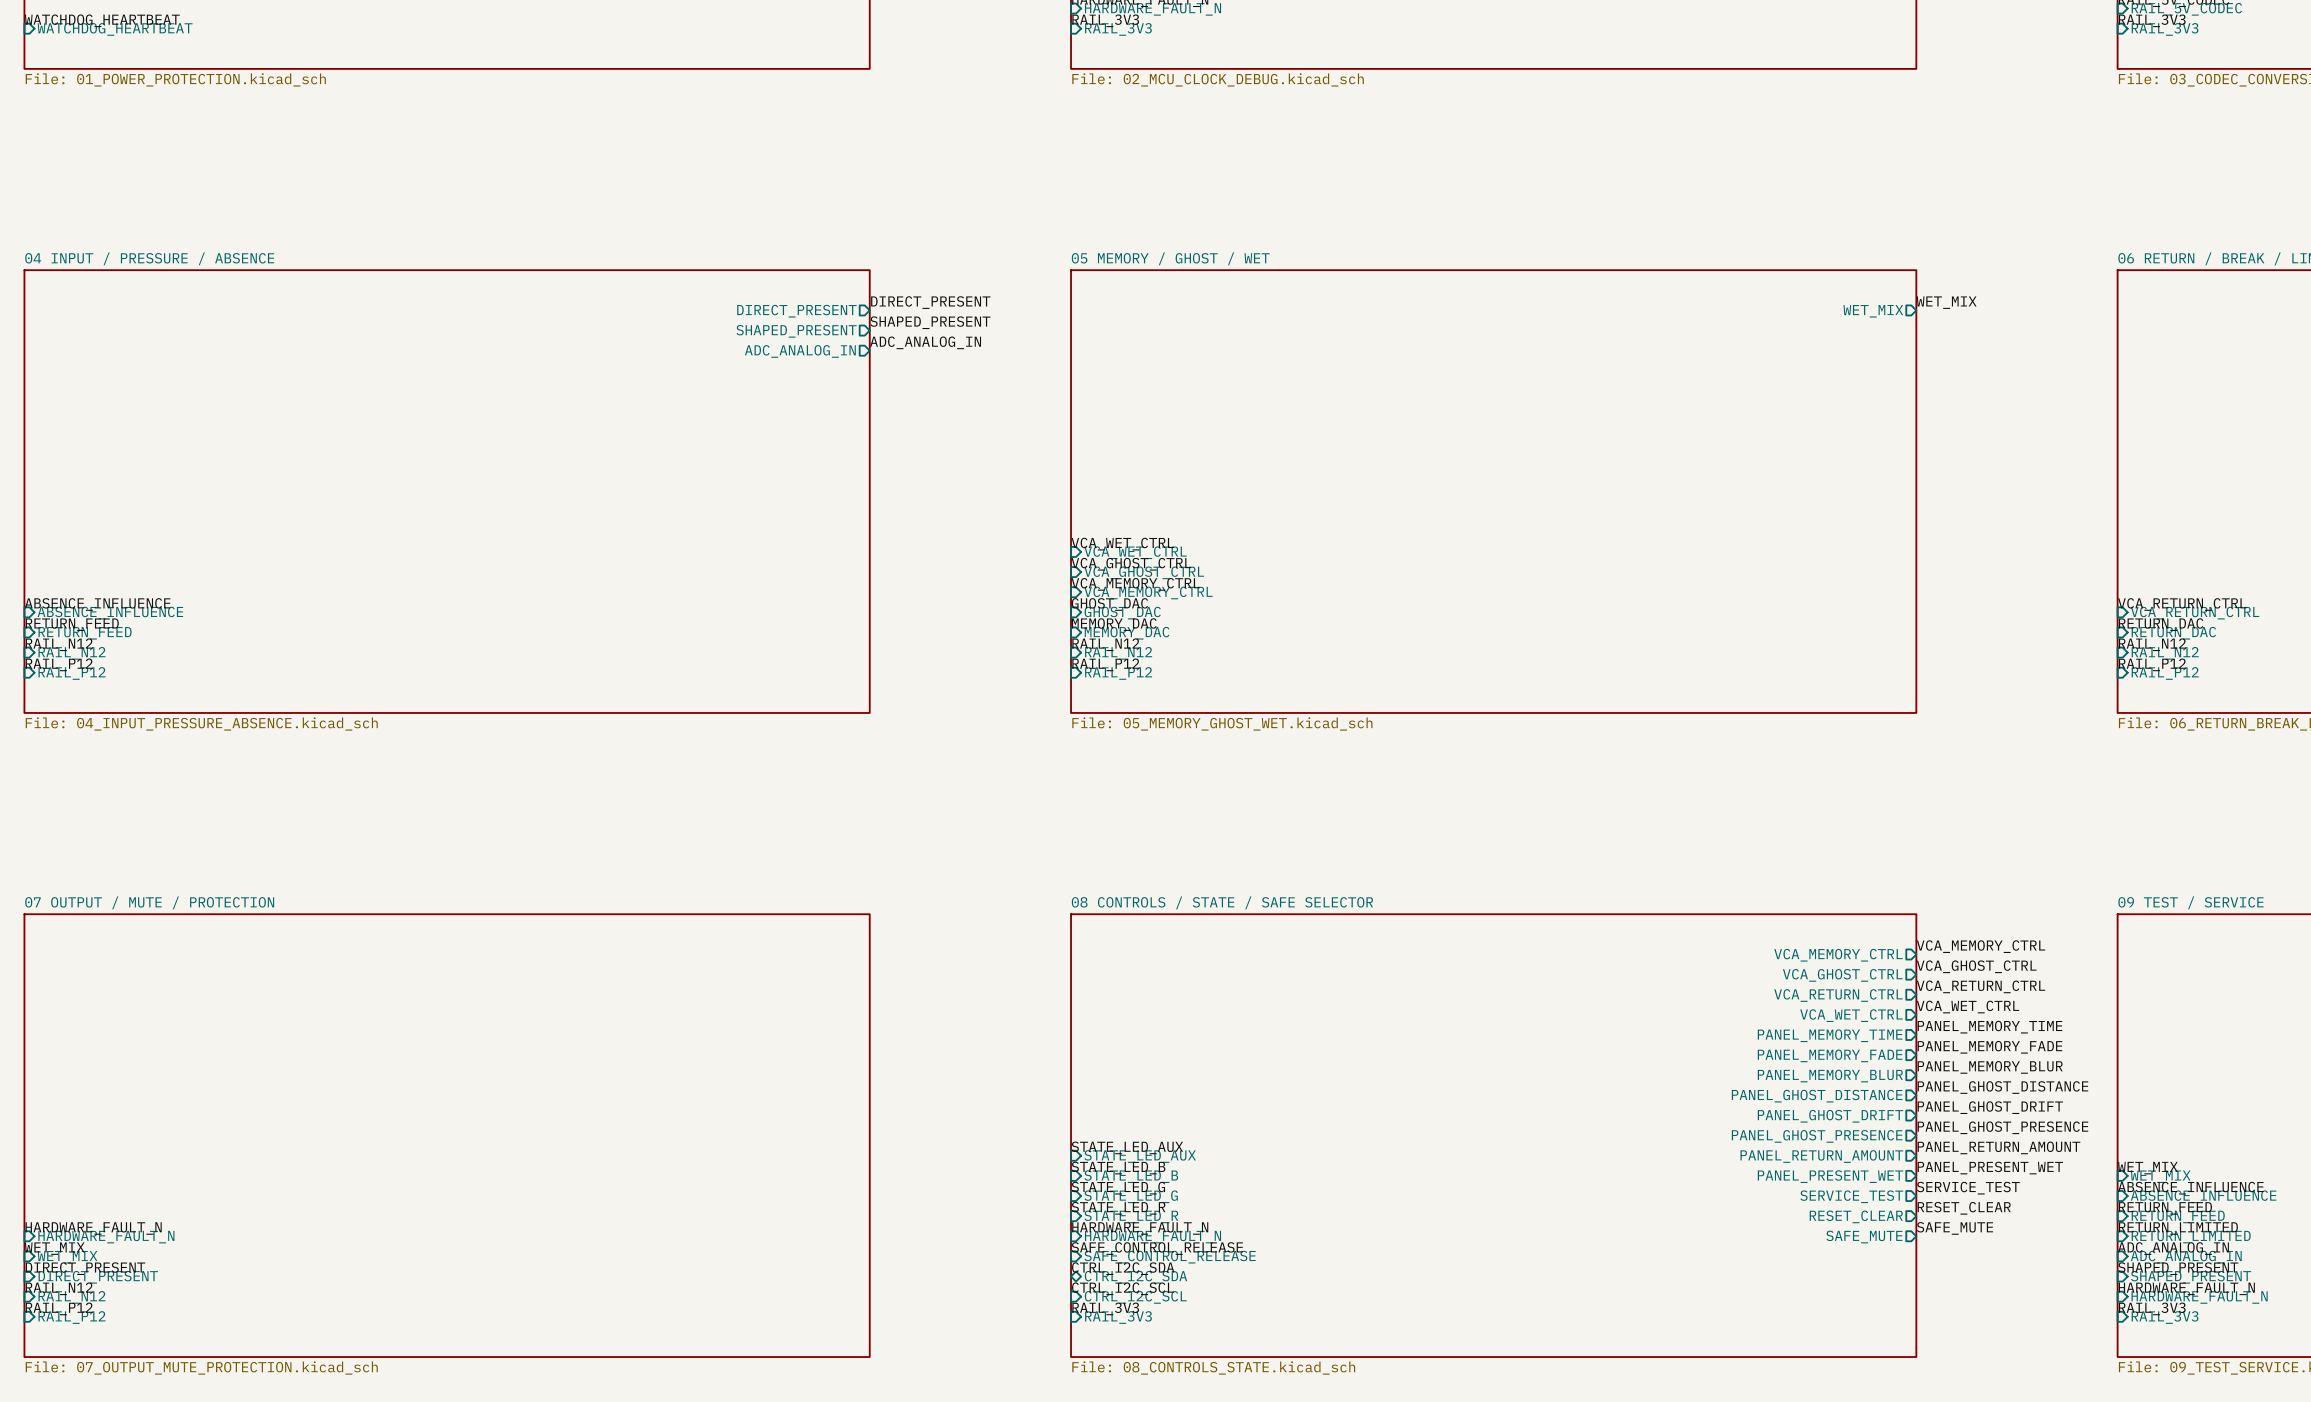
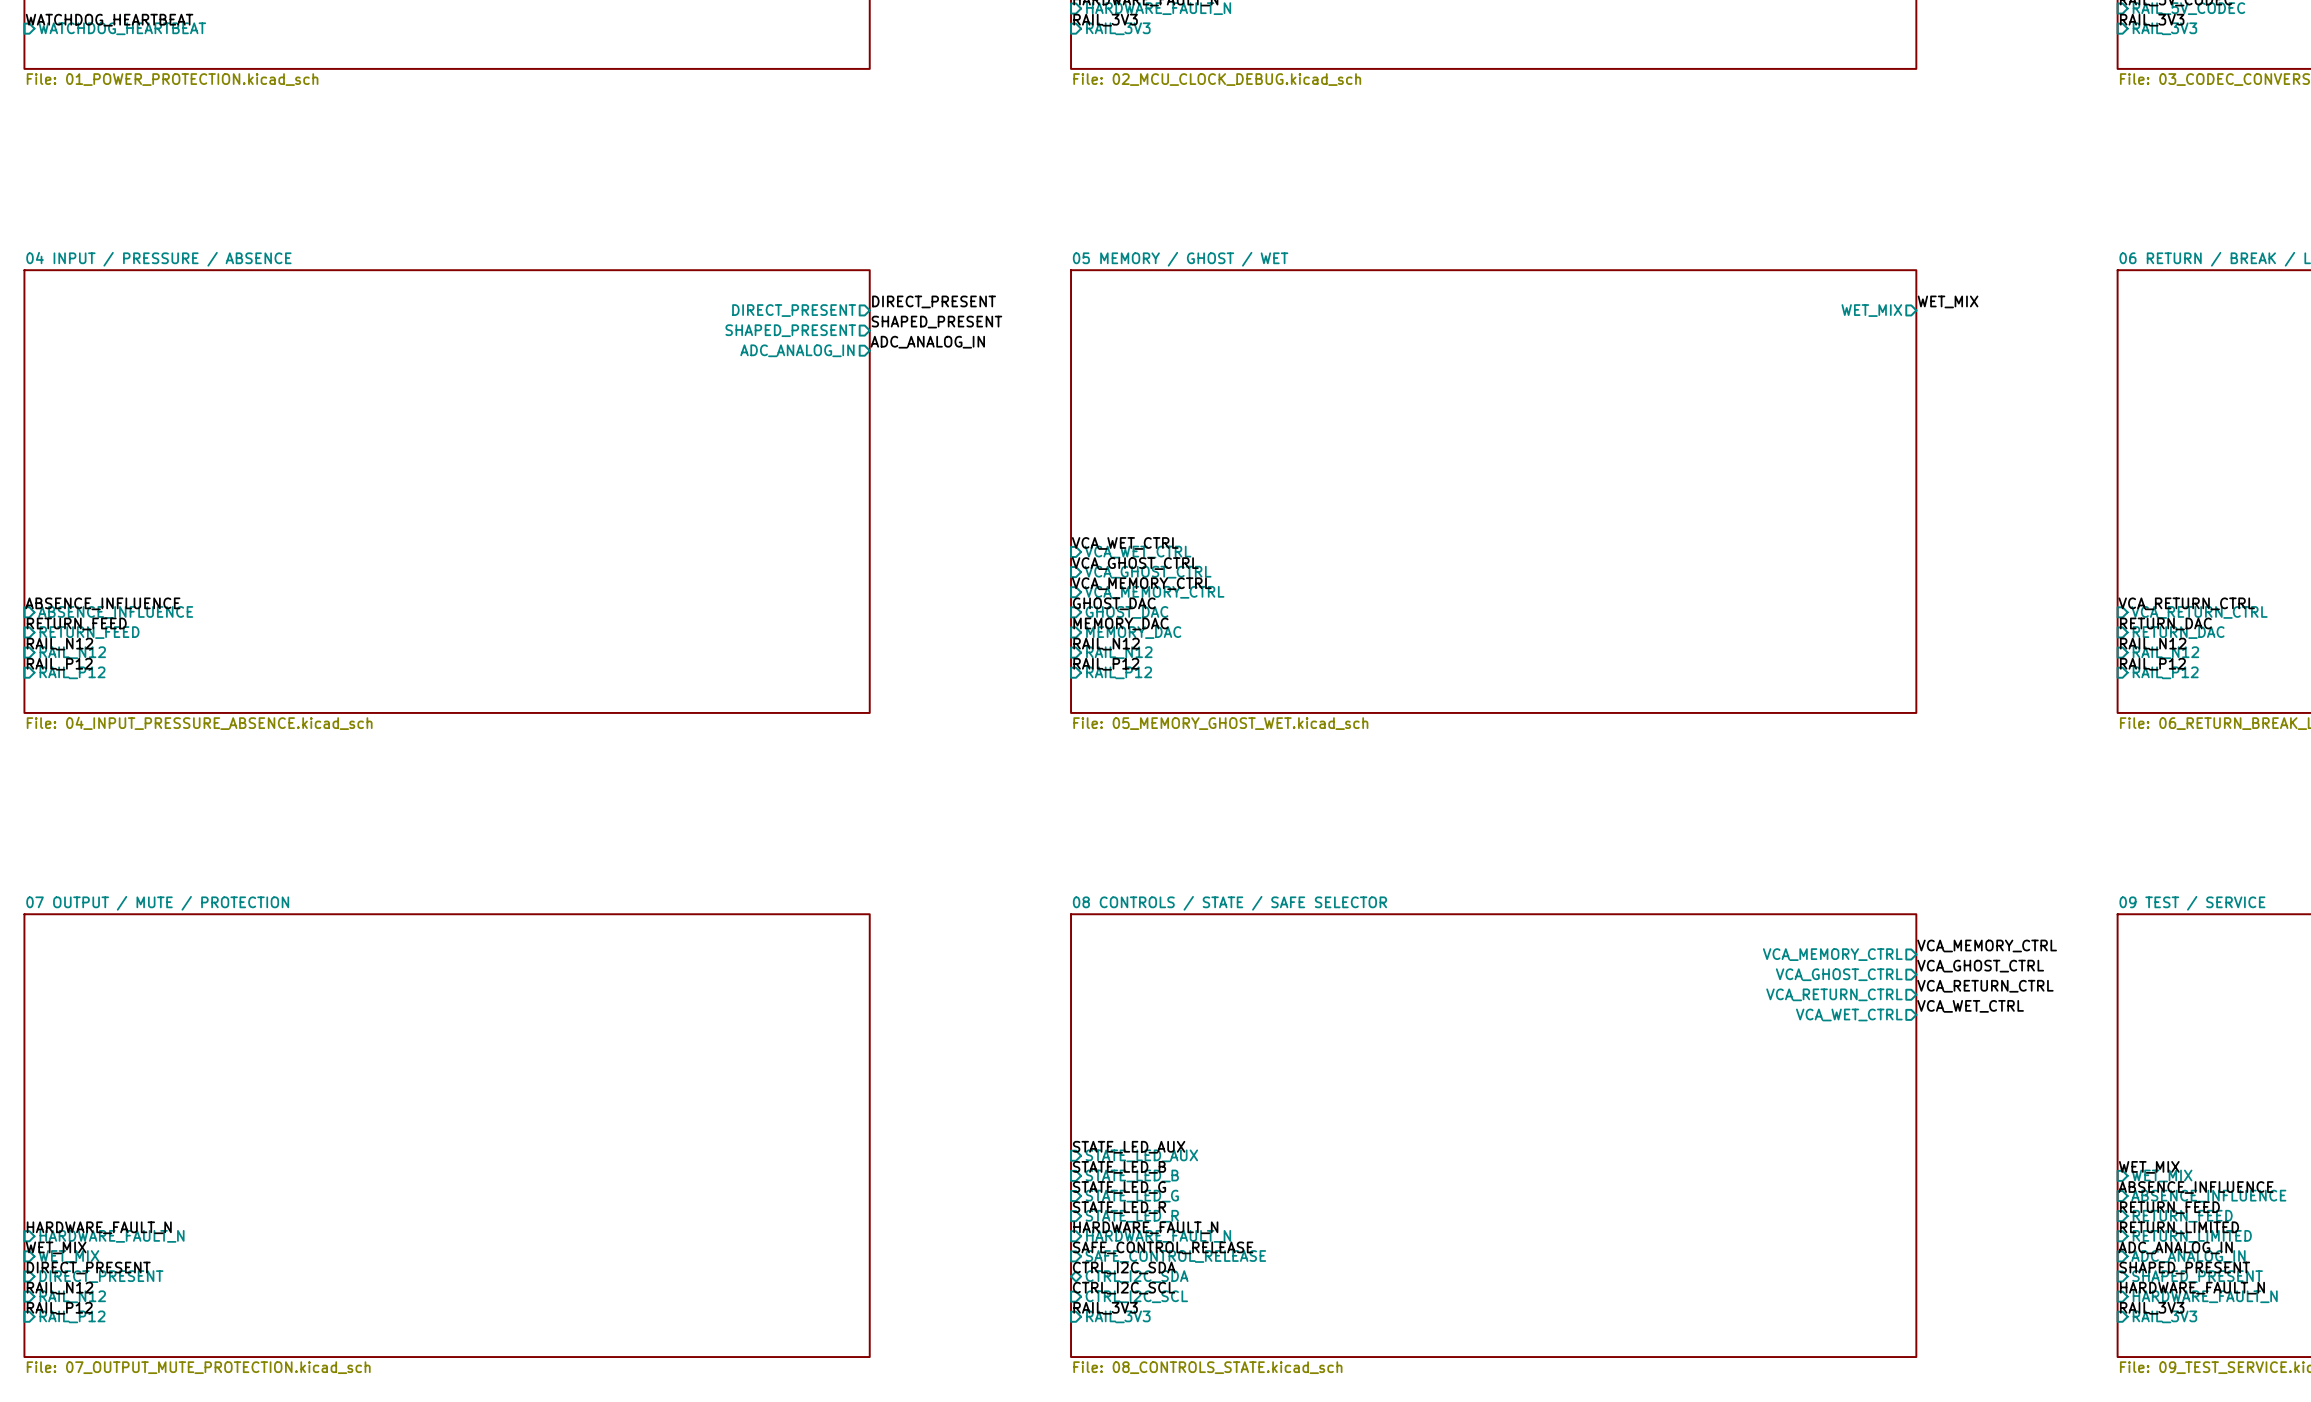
label: PANEL_MEMORY_TIME (1989, 1027) -> none
sheet pin: PANEL_MEMORY_TIME (1830, 1035) -> none
label: PANEL_MEMORY_FADE (1989, 1047) -> none
sheet pin: PANEL_MEMORY_FADE (1830, 1055) -> none
label: PANEL_MEMORY_BLUR (1990, 1067) -> none
sheet pin: PANEL_MEMORY_BLUR (1830, 1076) -> none
label: PANEL_GHOST_DISTANCE (2002, 1087) -> none
sheet pin: PANEL_GHOST_DISTANCE (1817, 1096) -> none
label: PANEL_GHOST_DRIFT (1990, 1107) -> none
sheet pin: PANEL_GHOST_DRIFT (1830, 1116) -> none
label: PANEL_GHOST_PRESENCE (2002, 1127) -> none
sheet pin: PANEL_GHOST_PRESENCE (1817, 1136) -> none
label: PANEL_RETURN_AMOUNT (1998, 1147) -> none
sheet pin: PANEL_RETURN_AMOUNT (1821, 1156) -> none
label: PANEL_PRESENT_WET (1990, 1168) -> none
sheet pin: PANEL_PRESENT_WET (1830, 1176) -> none
label: SERVICE_TEST (1968, 1188) -> none
sheet pin: SERVICE_TEST (1851, 1196) -> none
label: RESET_CLEAR (1964, 1208) -> none
sheet pin: RESET_CLEAR (1856, 1216) -> none
label: SAFE_MUTE (1955, 1228) -> none
sheet pin: SAFE_MUTE (1864, 1237) -> none

